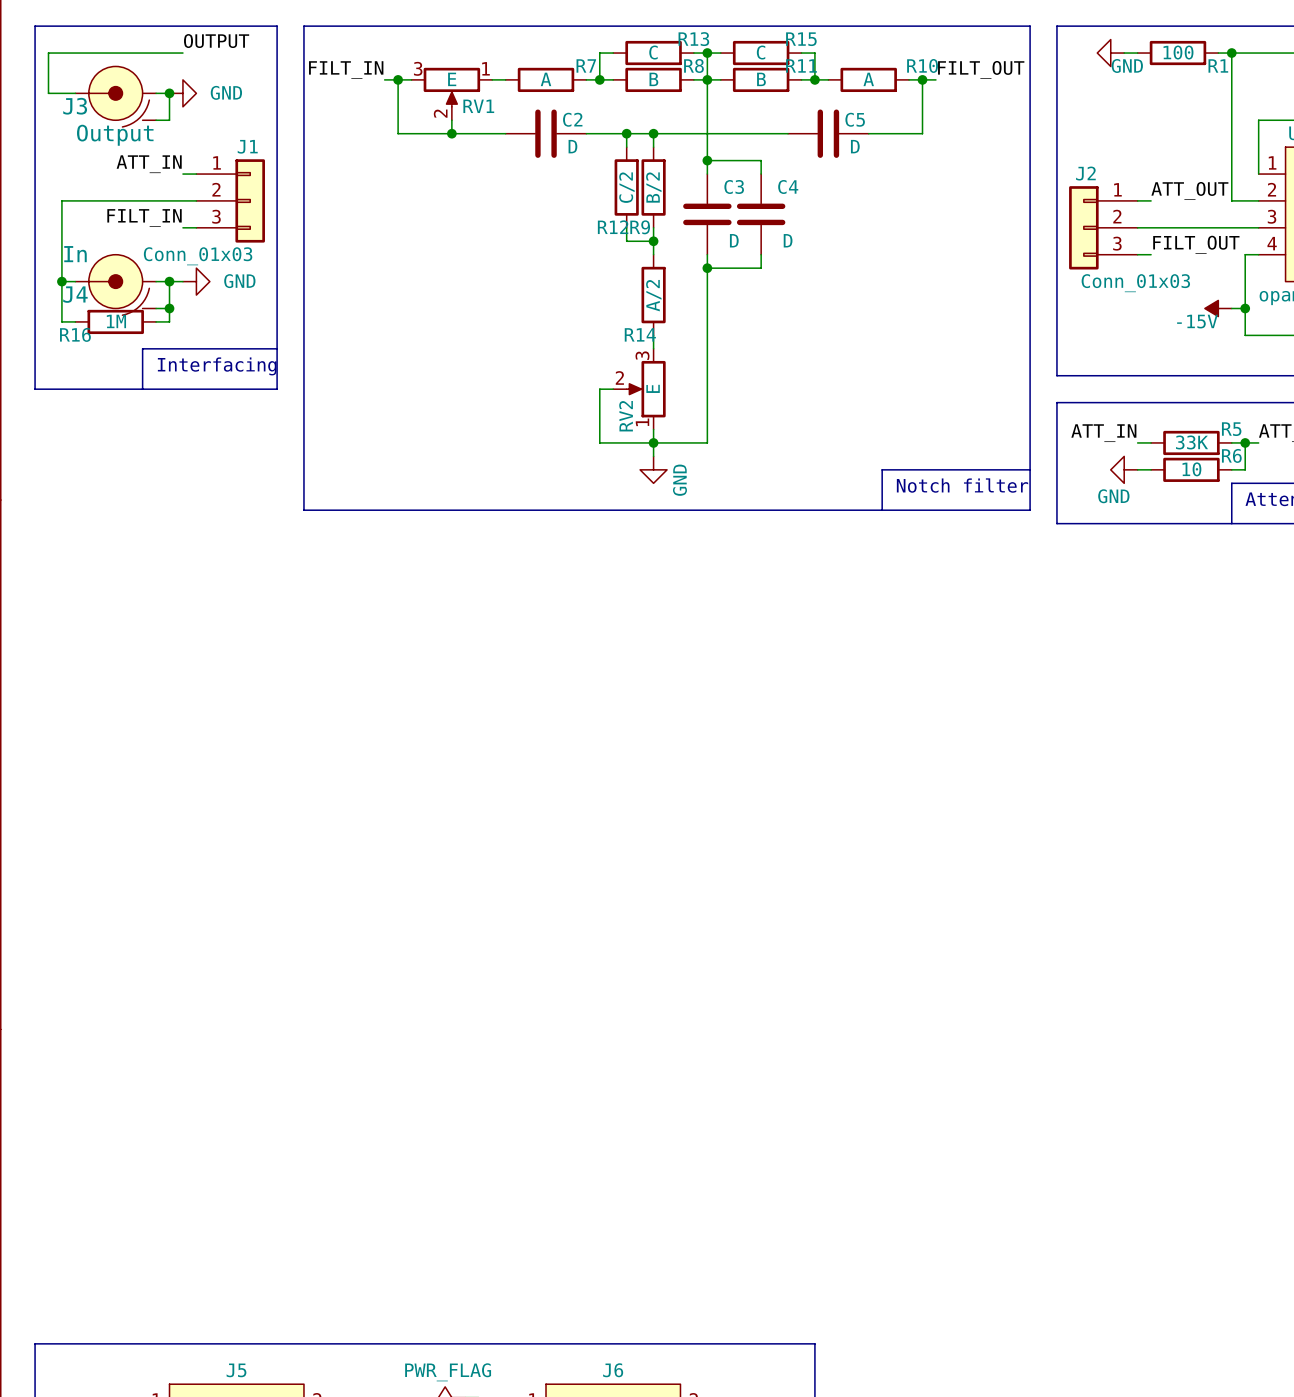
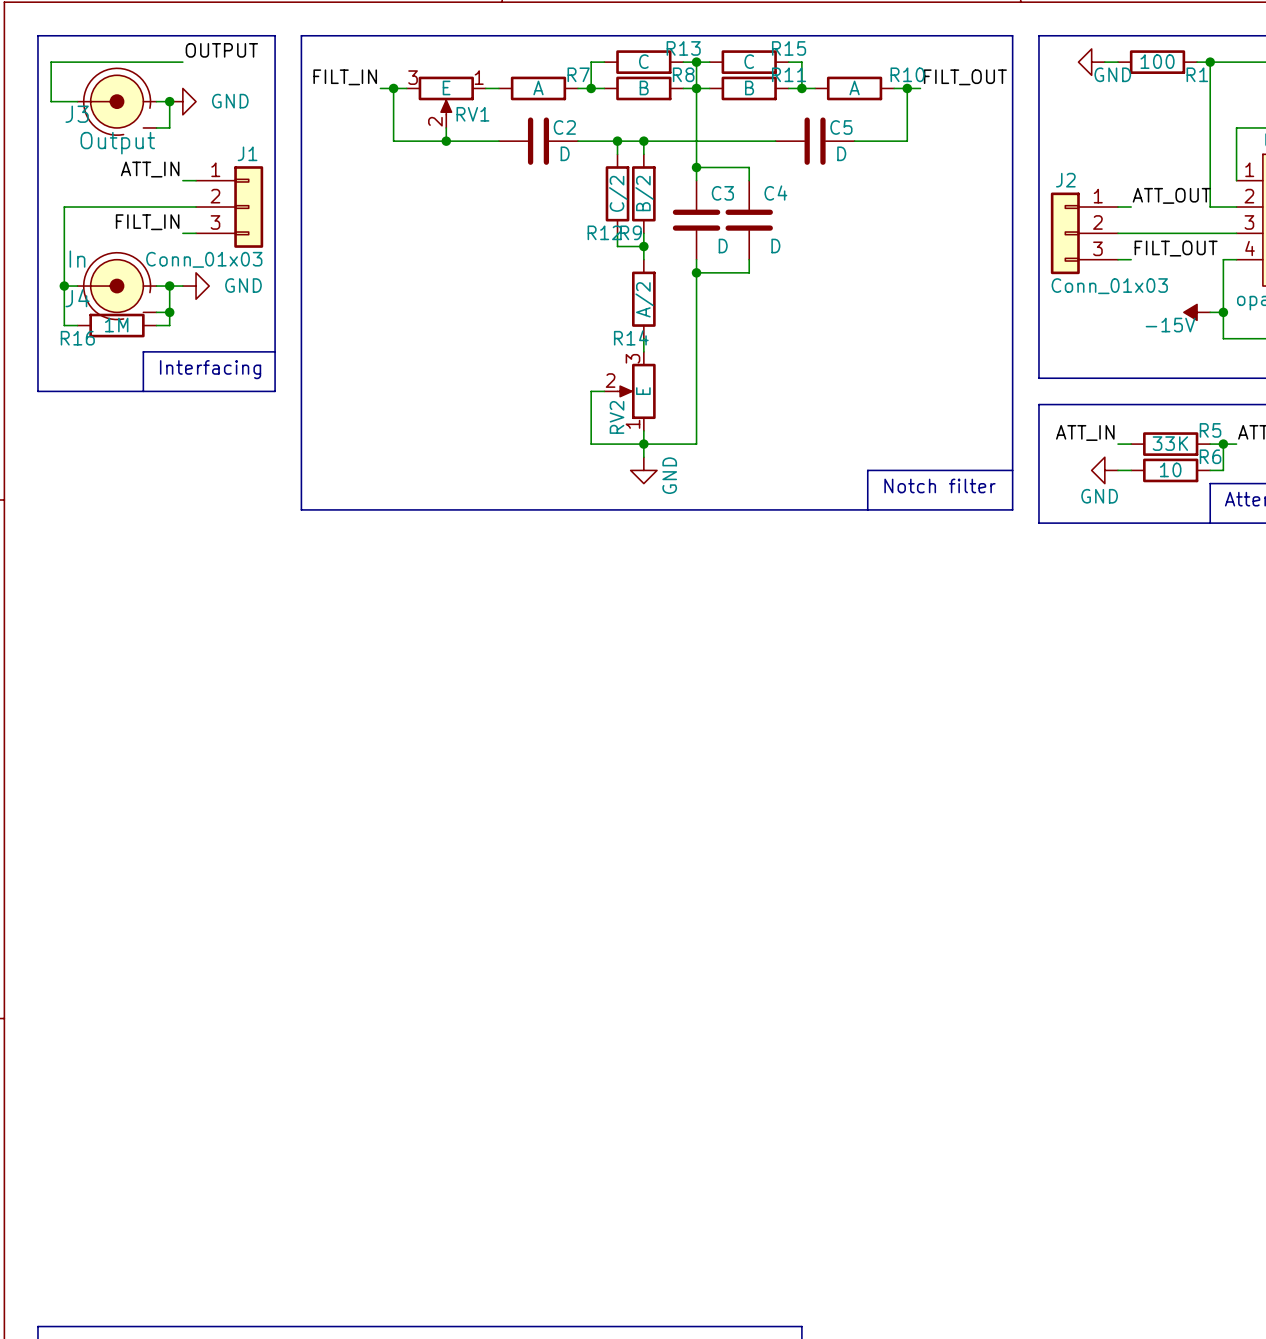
J3 symbol: [75, 66, 157, 127] -> [77, 68, 157, 136]
J4 symbol: [75, 254, 157, 316] -> [77, 252, 157, 320]

